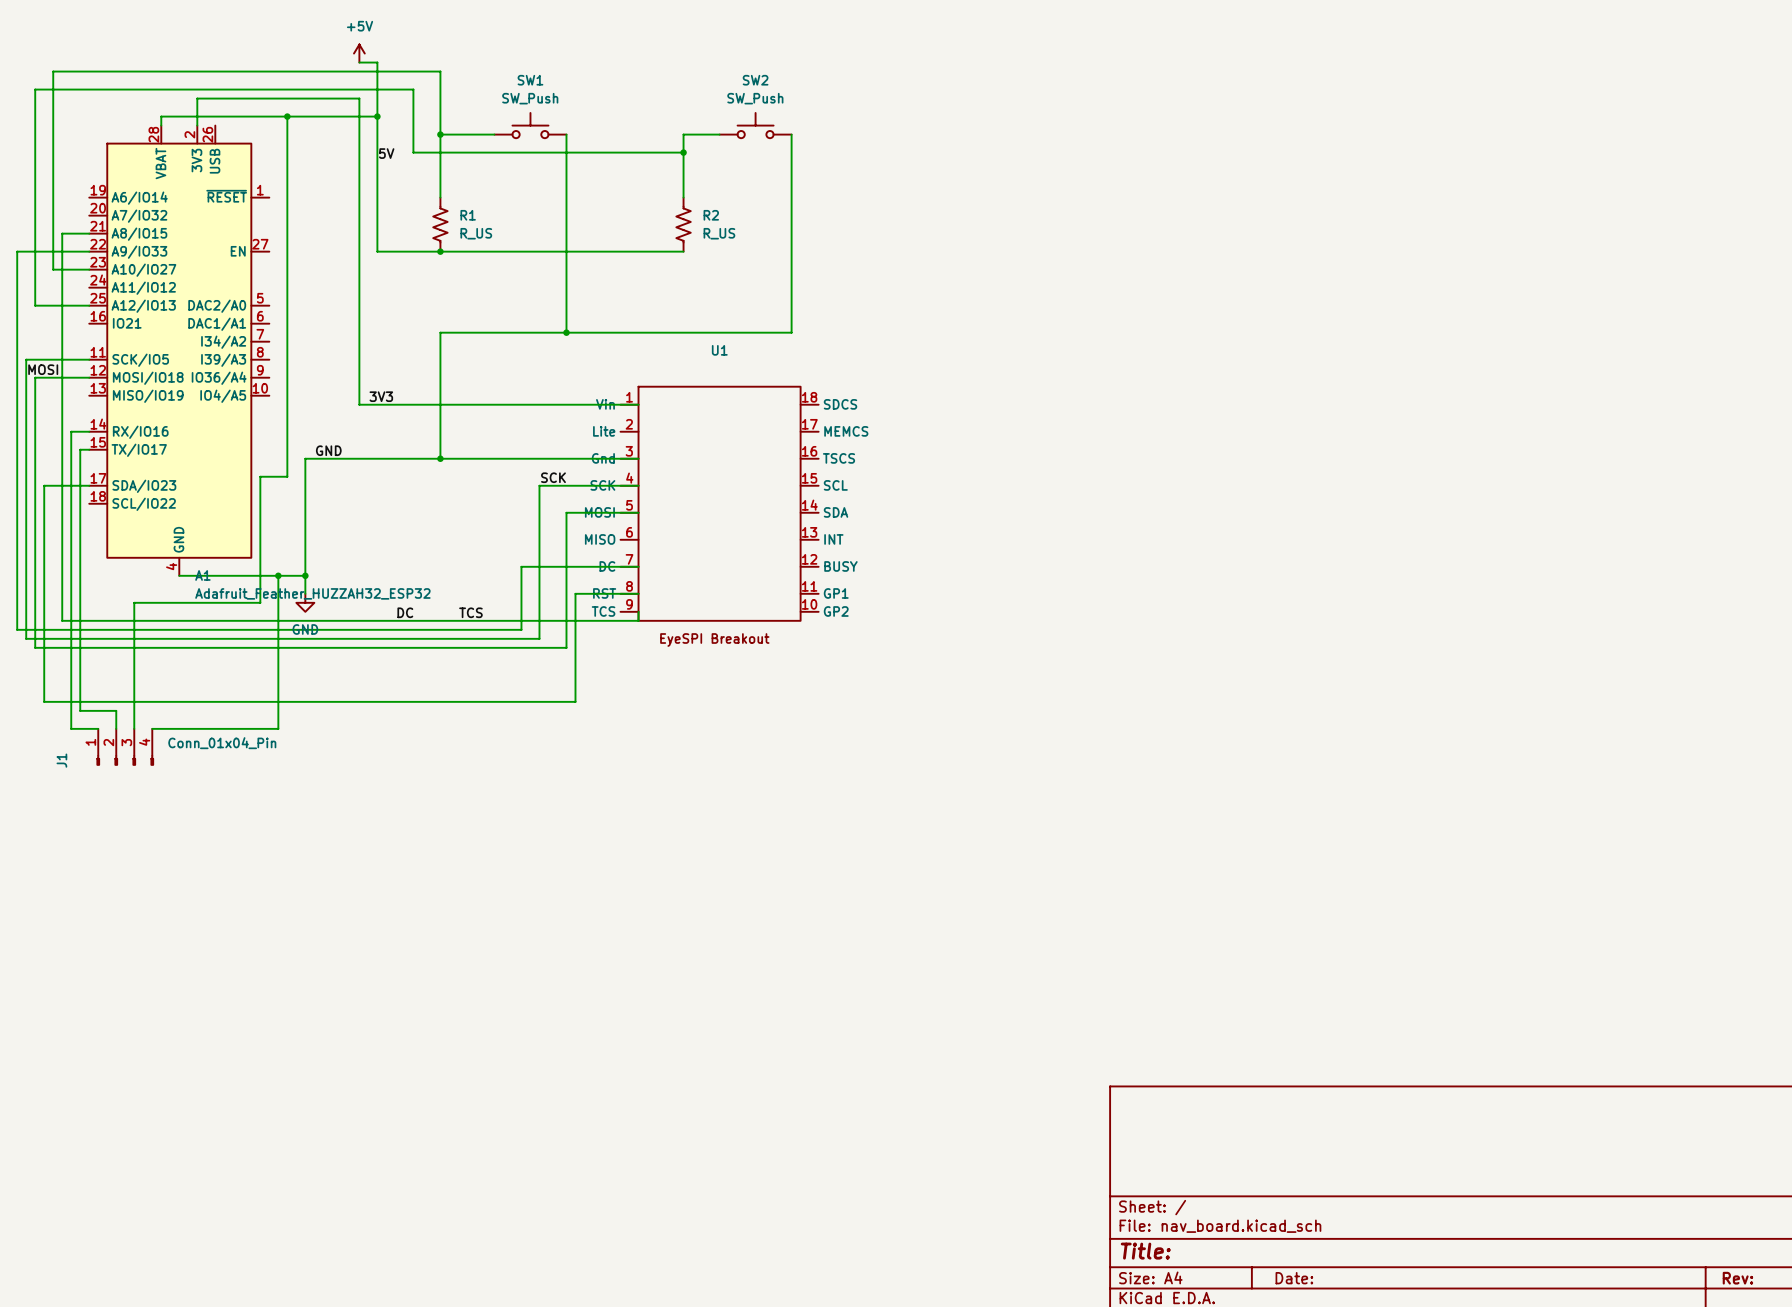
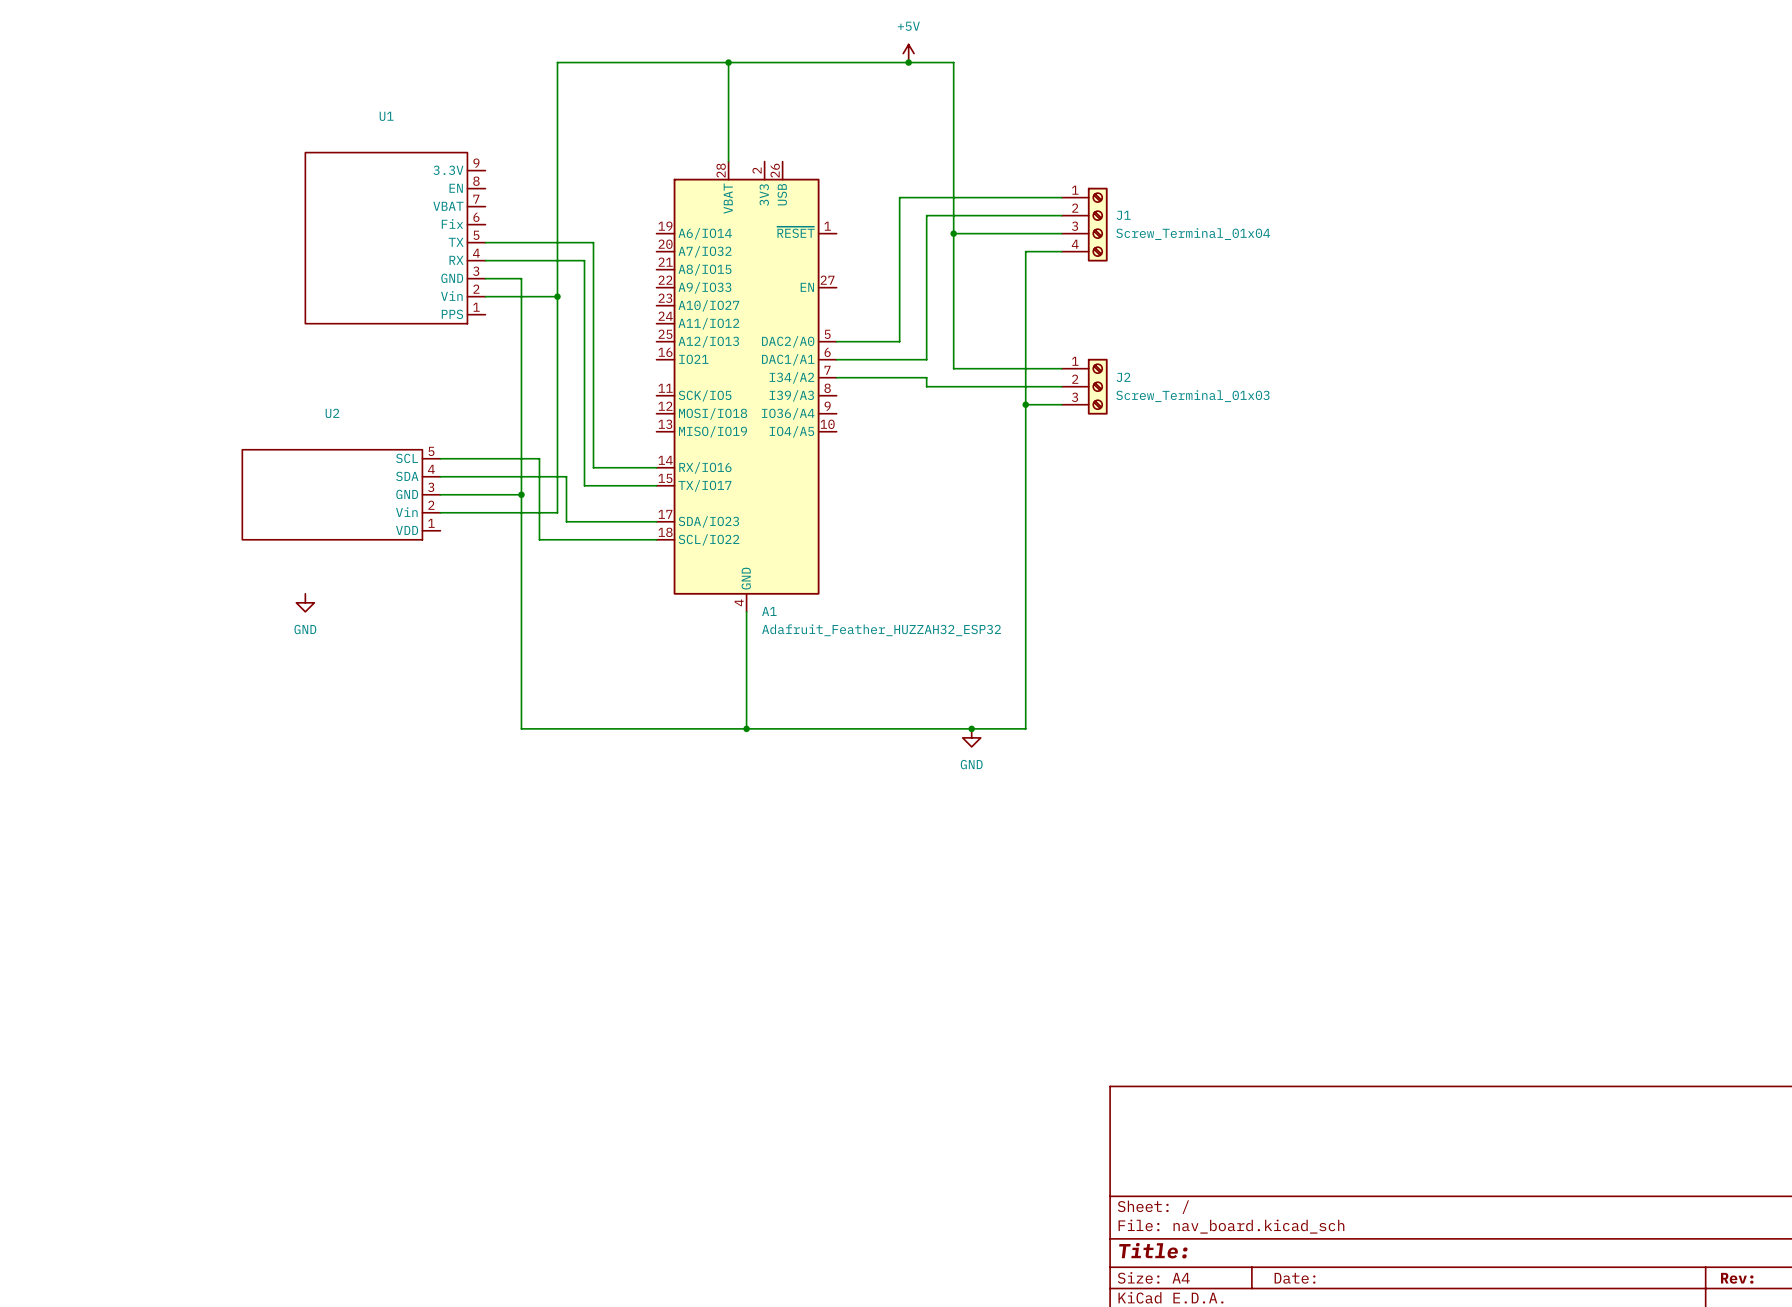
power symbol: +5V (359, 53) -> none
power symbol: none -> +5V (908, 53)
wire: (359, 62) (377, 62) (377, 251) (683, 251) -> none
wire: none -> (728, 62) (728, 161)
junction: none -> (728, 62)
junction: none -> (908, 62)
wire: (287, 116) (287, 476) (260, 476) (260, 602) (134, 602) (134, 728) -> none
junction: (287, 116) -> none
wire: (377, 116) (161, 116) (161, 125) -> none
junction: (377, 116) -> none
wire: (197, 125) (197, 98) (359, 98) (359, 404) (638, 404) -> none
SW1: SW_Push (530, 125) -> none
SW2: SW_Push (755, 125) -> none
wire: (440, 134) (494, 134) -> none
junction: (440, 134) -> none
wire: (566, 134) (566, 332) -> none
wire: (719, 134) (683, 134) (683, 197) -> none
wire: (791, 134) (791, 332) (440, 332) (440, 458) (305, 458) (305, 593) -> none
wire: (683, 152) (413, 152) (413, 89) (35, 89) (35, 305) (89, 305) -> none
junction: (683, 152) -> none
label: 5V (386, 153) -> none
wire: (440, 197) (440, 71) (53, 71) (53, 269) (89, 269) -> none
wire: none -> (1061, 197) (899, 197) (899, 341) (836, 341)
wire: none -> (1061, 215) (926, 215) (926, 359) (836, 359)
R1: R_US (440, 224) -> none
R2: R_US (683, 224) -> none
wire: (89, 233) (62, 233) (62, 620) (638, 620) (638, 611) -> none
wire: none -> (953, 233) (1061, 233)
junction: none -> (953, 233)
wire: none -> (485, 242) (593, 242) (593, 467) (656, 467)
wire: (89, 251) (17, 251) (17, 629) (521, 629) -> (1061, 251) (1025, 251) (1025, 728) (521, 728) (521, 629)
junction: (440, 251) -> none
wire: none -> (485, 260) (584, 260) (584, 485)
wire: none -> (485, 296) (557, 296)
junction position: (566, 332) -> (557, 296)
A1 position: (179, 350) -> (746, 386)
U1 name position: U1 (719, 350) -> U1 (386, 116)
wire: (89, 359) (26, 359) (26, 638) (539, 638) (539, 539) -> (656, 539) (539, 539)
wire: none -> (1061, 368) (953, 368) (953, 62) (557, 62) (557, 512) (440, 512)
label: MOSI (43, 369) -> none
wire: (89, 377) (35, 377) (35, 647) (566, 647) (566, 521) -> (656, 521) (566, 521)
wire: none -> (836, 377) (926, 377) (926, 386) (1061, 386)
U1 symbol: [620, 386, 819, 621] -> [305, 152, 486, 324]
J2: none -> Screw_Terminal_01x03 (1084, 386)
label: 3V3 (381, 396) -> none
wire: none -> (1025, 404) (1061, 404)
junction: none -> (1025, 404)
wire: (89, 431) (71, 431) (71, 728) (98, 728) -> none
wire: (89, 449) (80, 449) (80, 710) (116, 710) (116, 728) -> none
label: GND (328, 450) -> none
junction: (440, 458) -> none
wire: (539, 458) (638, 458) -> none
label: SCK (553, 477) -> none
wire: (89, 485) (44, 485) (44, 701) (575, 701) (575, 593) (638, 593) -> none
wire: (539, 485) (584, 485) -> (539, 485) (539, 458)
wire: none -> (638, 485) (656, 485)
U2: none -> (341, 494)
wire: none -> (440, 494) (521, 494)
junction: none -> (521, 494)
wire: (566, 512) (638, 512) -> (566, 512) (566, 476) (440, 476)
wire: (521, 566) (638, 566) -> (521, 566) (521, 278) (485, 278)
wire: (179, 575) (305, 575) -> none
wire: (278, 575) (278, 728) (152, 728) -> none
junction: (278, 575) -> none
junction: (305, 575) -> none
wire: none -> (746, 611) (746, 728)
label: DC (405, 612) -> none
label: TCS (470, 612) -> none
J1 symbol: [96, 728, 154, 766] -> [1061, 187, 1108, 262]
junction: none -> (746, 728)
junction: none -> (971, 728)
power symbol: none -> GND (971, 737)
J1 value: Conn_01x04_Pin (222, 743) -> Screw_Terminal_01x04 (1193, 234)
J1 name position: J1 (61, 760) -> J1 (1123, 215)

